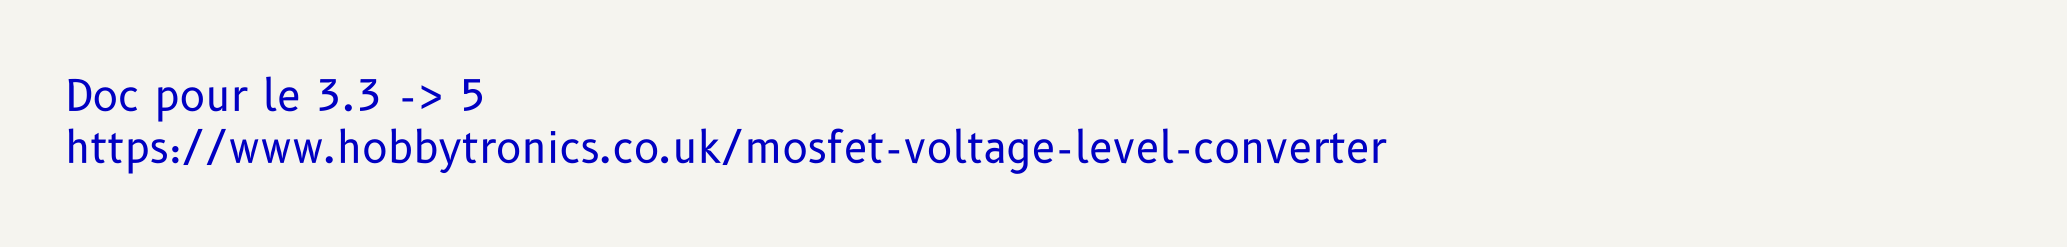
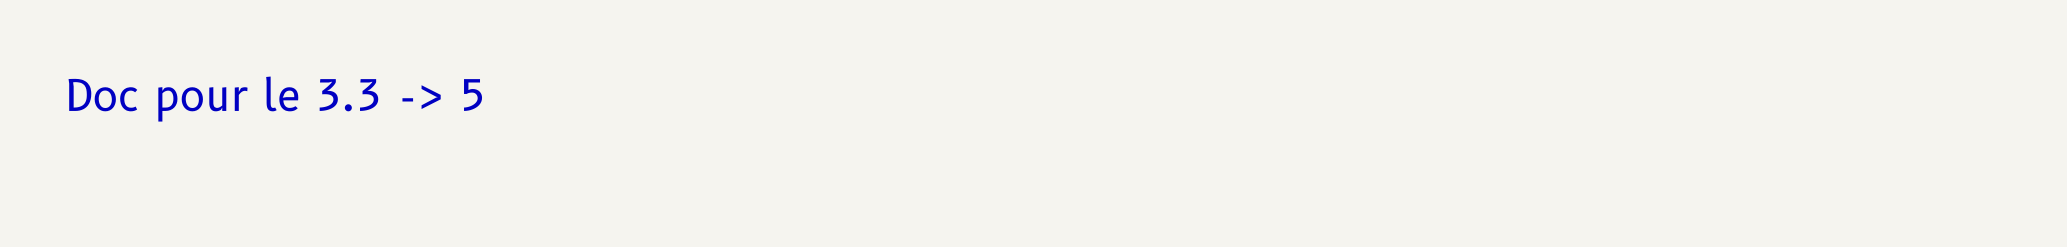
text: https://www.hobbytronics.co.uk/mosfet-voltage-level-converter (727, 151) -> none

